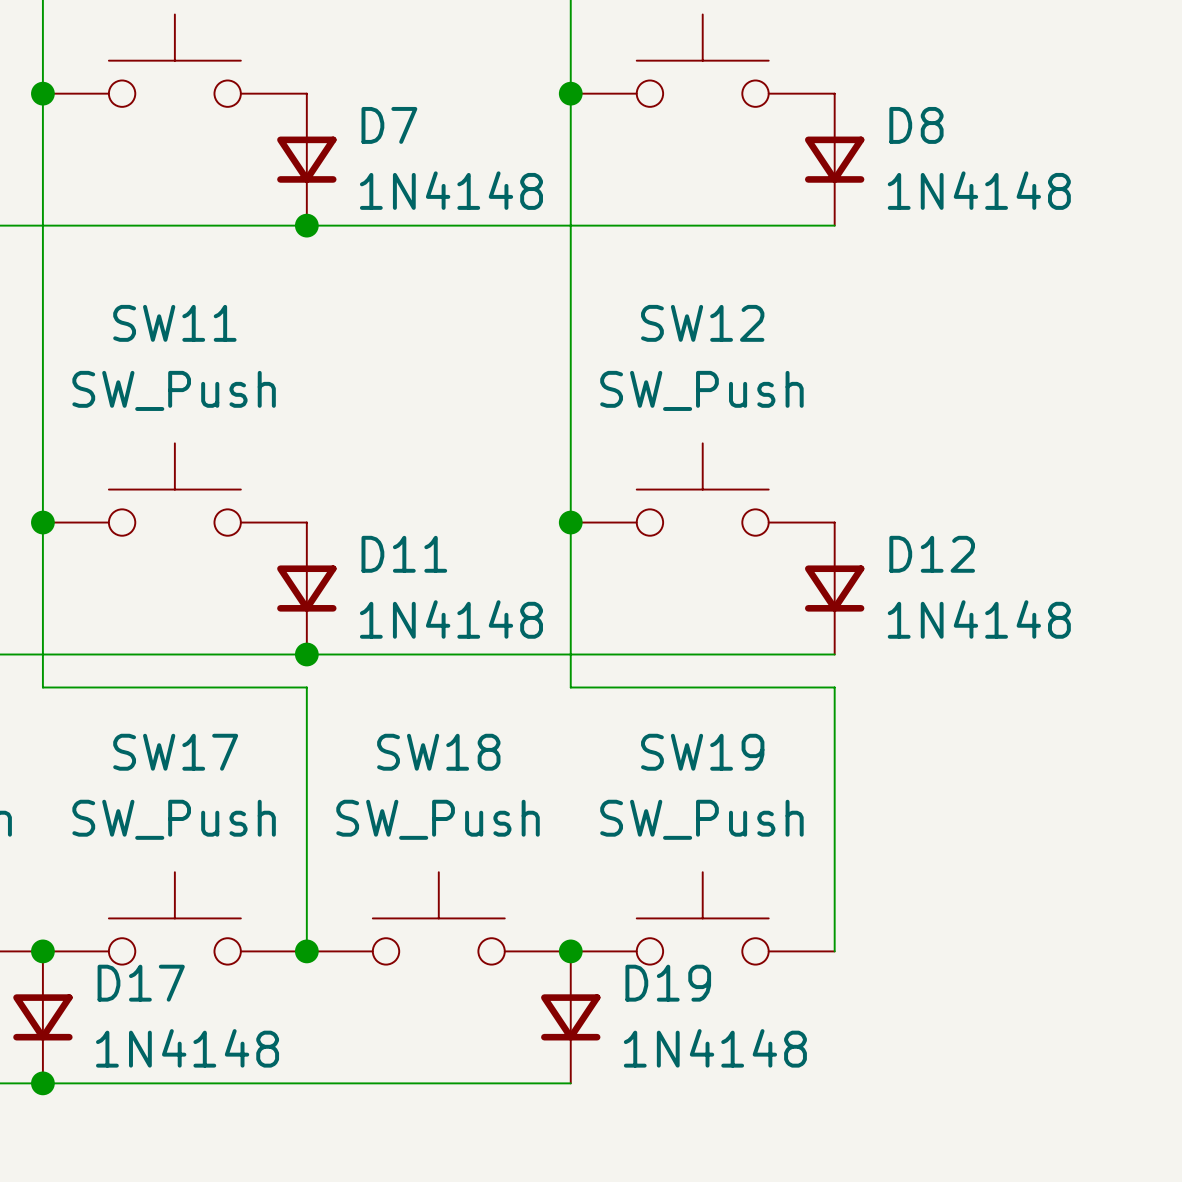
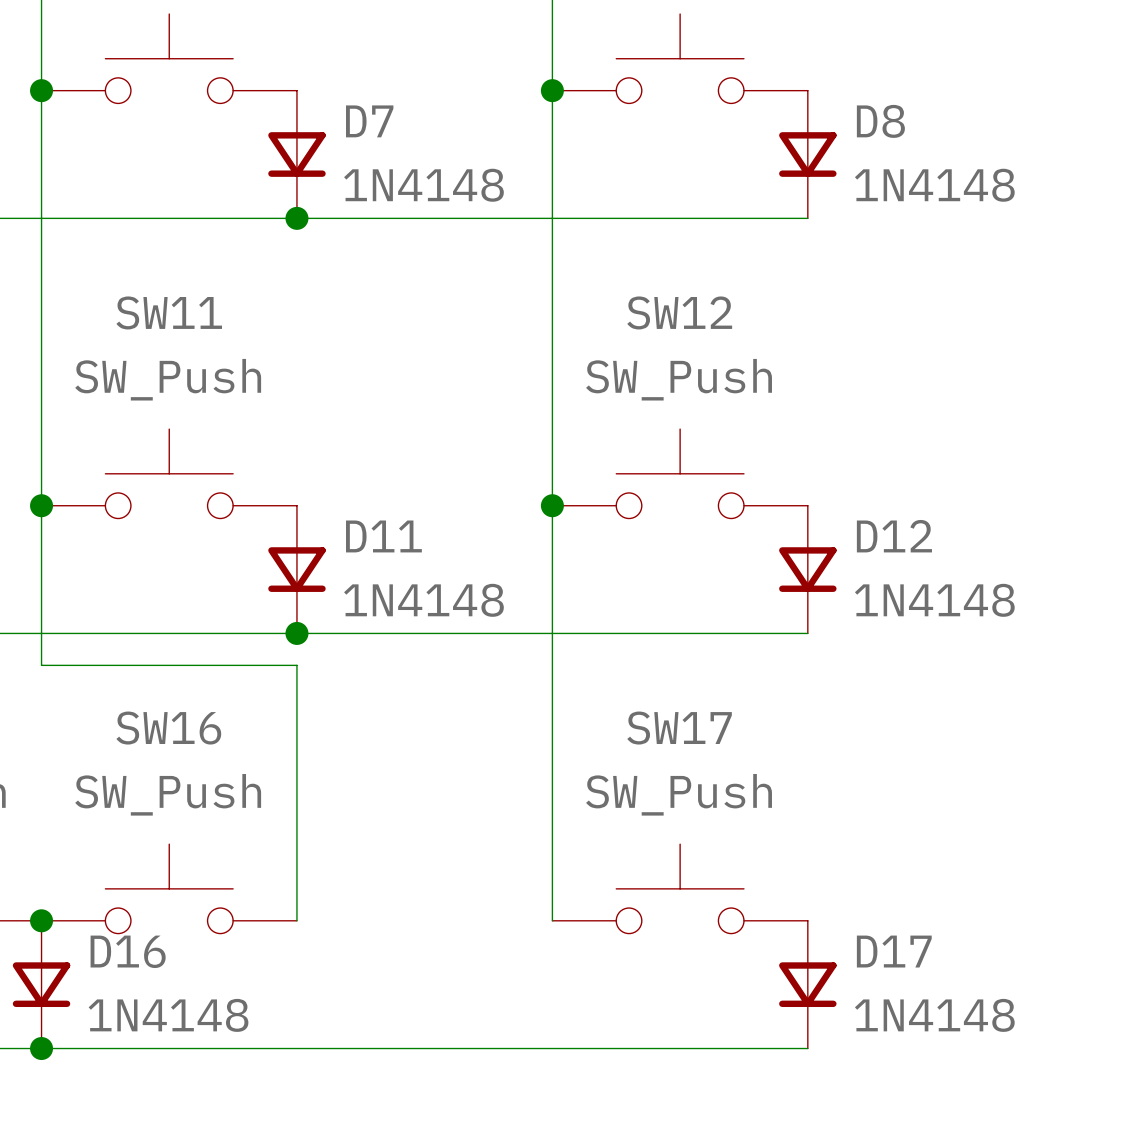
wire: (570, 687) (834, 687) (834, 951) -> (552, 665) (552, 920)
SW17 name: SW17 (175, 752) -> SW16 (168, 728)
SW19 name: SW19 (702, 752) -> SW17 (679, 728)
SW18: SW_Push (438, 918) -> none
junction: (306, 951) -> none
junction: (570, 951) -> none
D17 name: D17 (141, 983) -> D16 (128, 951)
D19: 1N4148 (570, 1017) -> none
D17: none -> 1N4148 (807, 984)
wire: none -> (552, 1048) (807, 1048)

